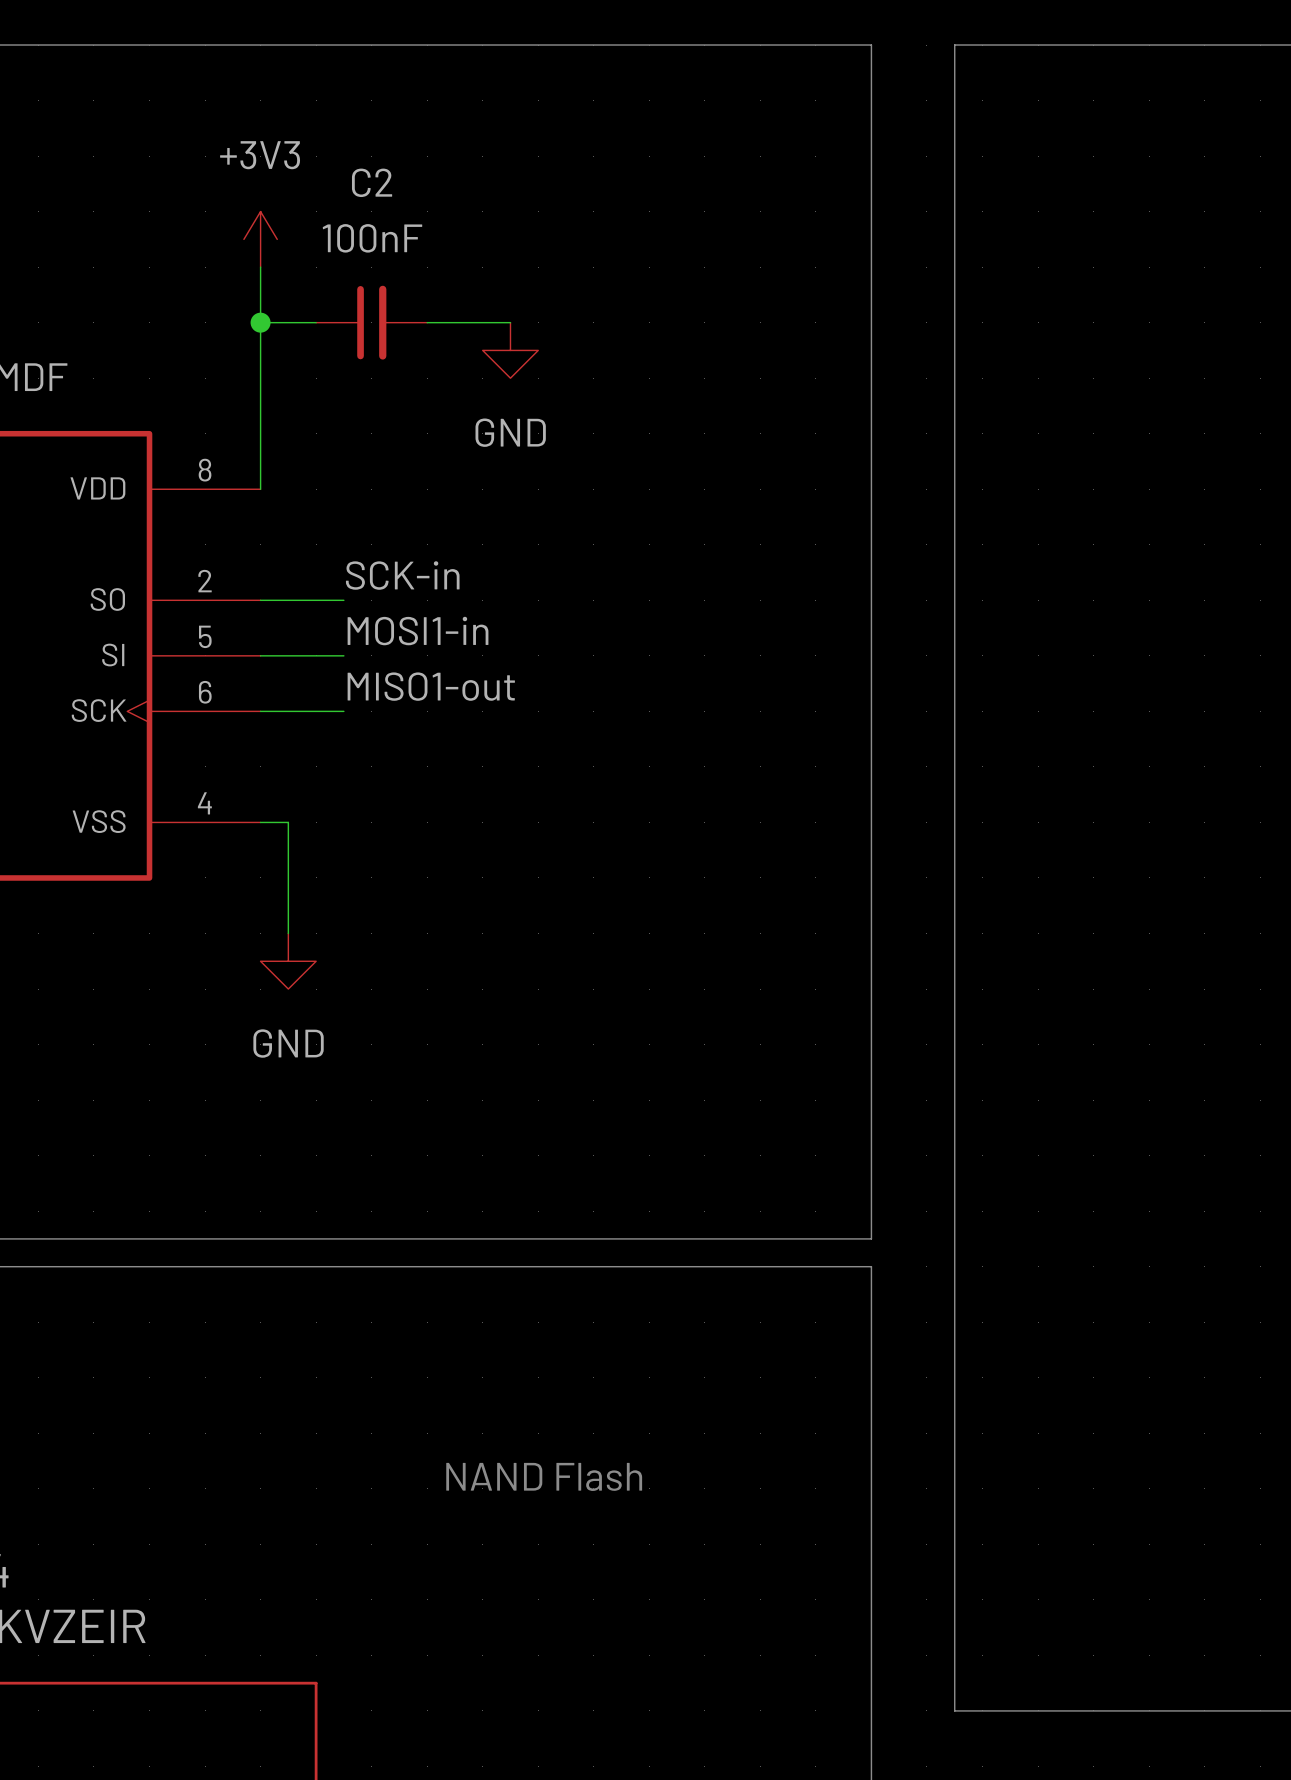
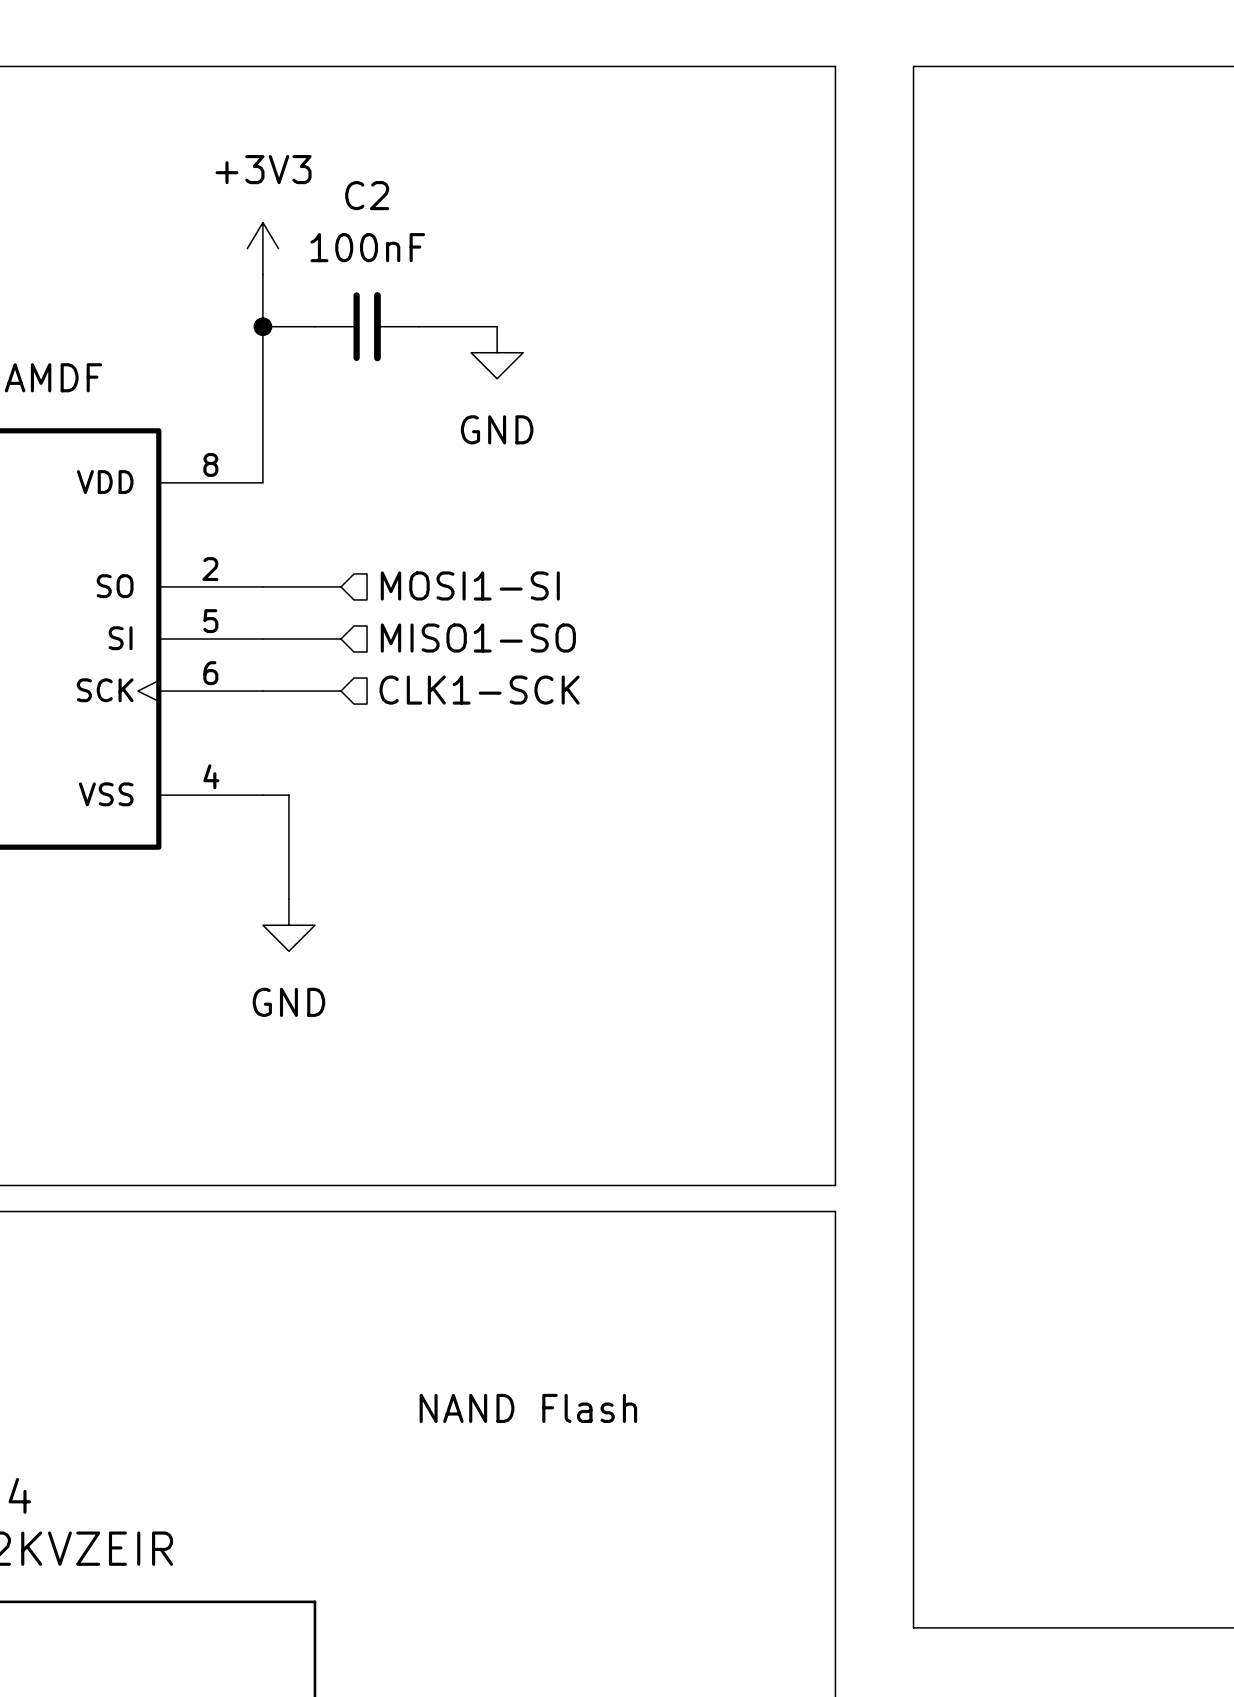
label: SCK-in (402, 575) -> none
hierarchical label: none -> MOSI1-SI (470, 585)
label: MOSI1-in (418, 631) -> none
hierarchical label: none -> MISO1-SO (478, 638)
label: MISO1-out (431, 686) -> none
hierarchical label: none -> CLK1-SCK (479, 690)

